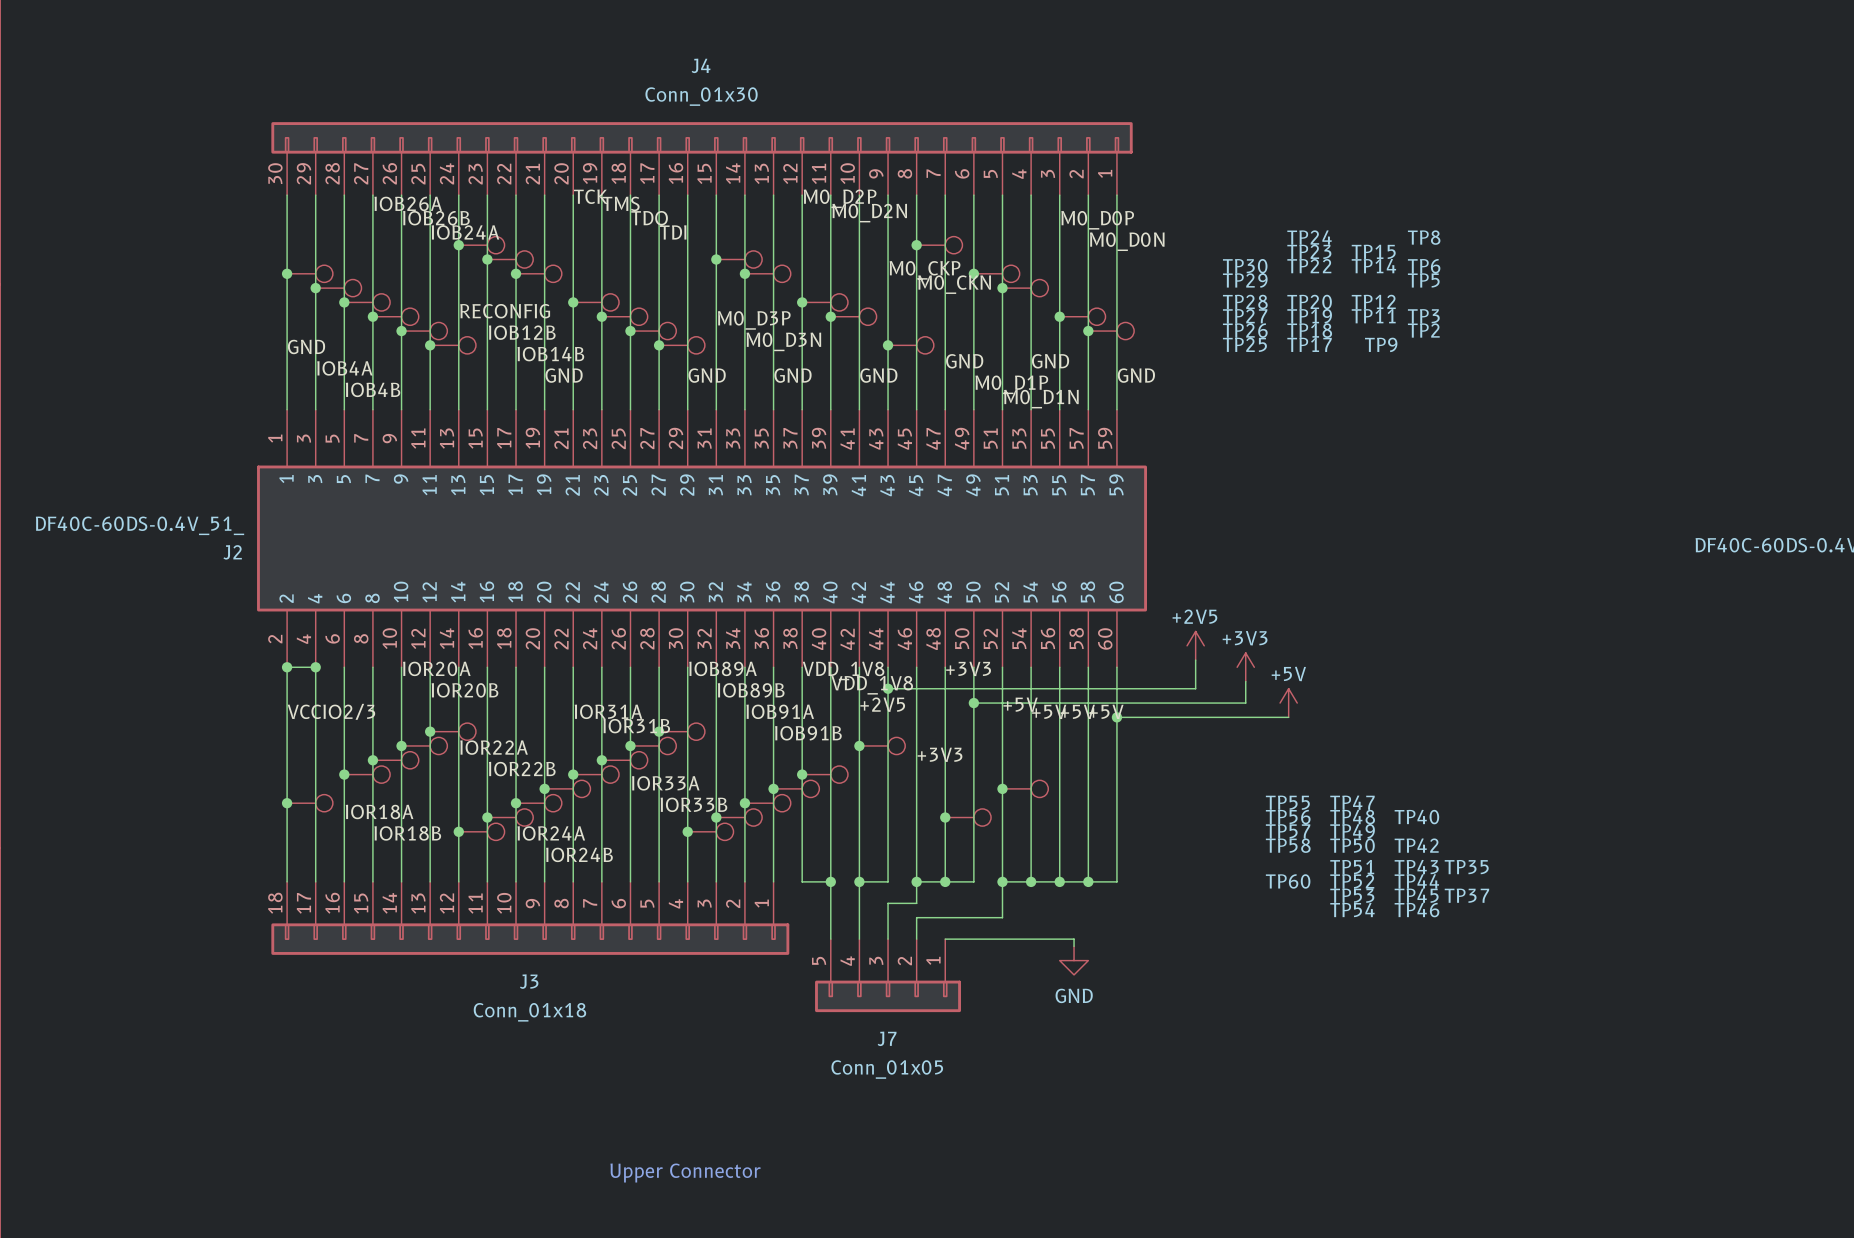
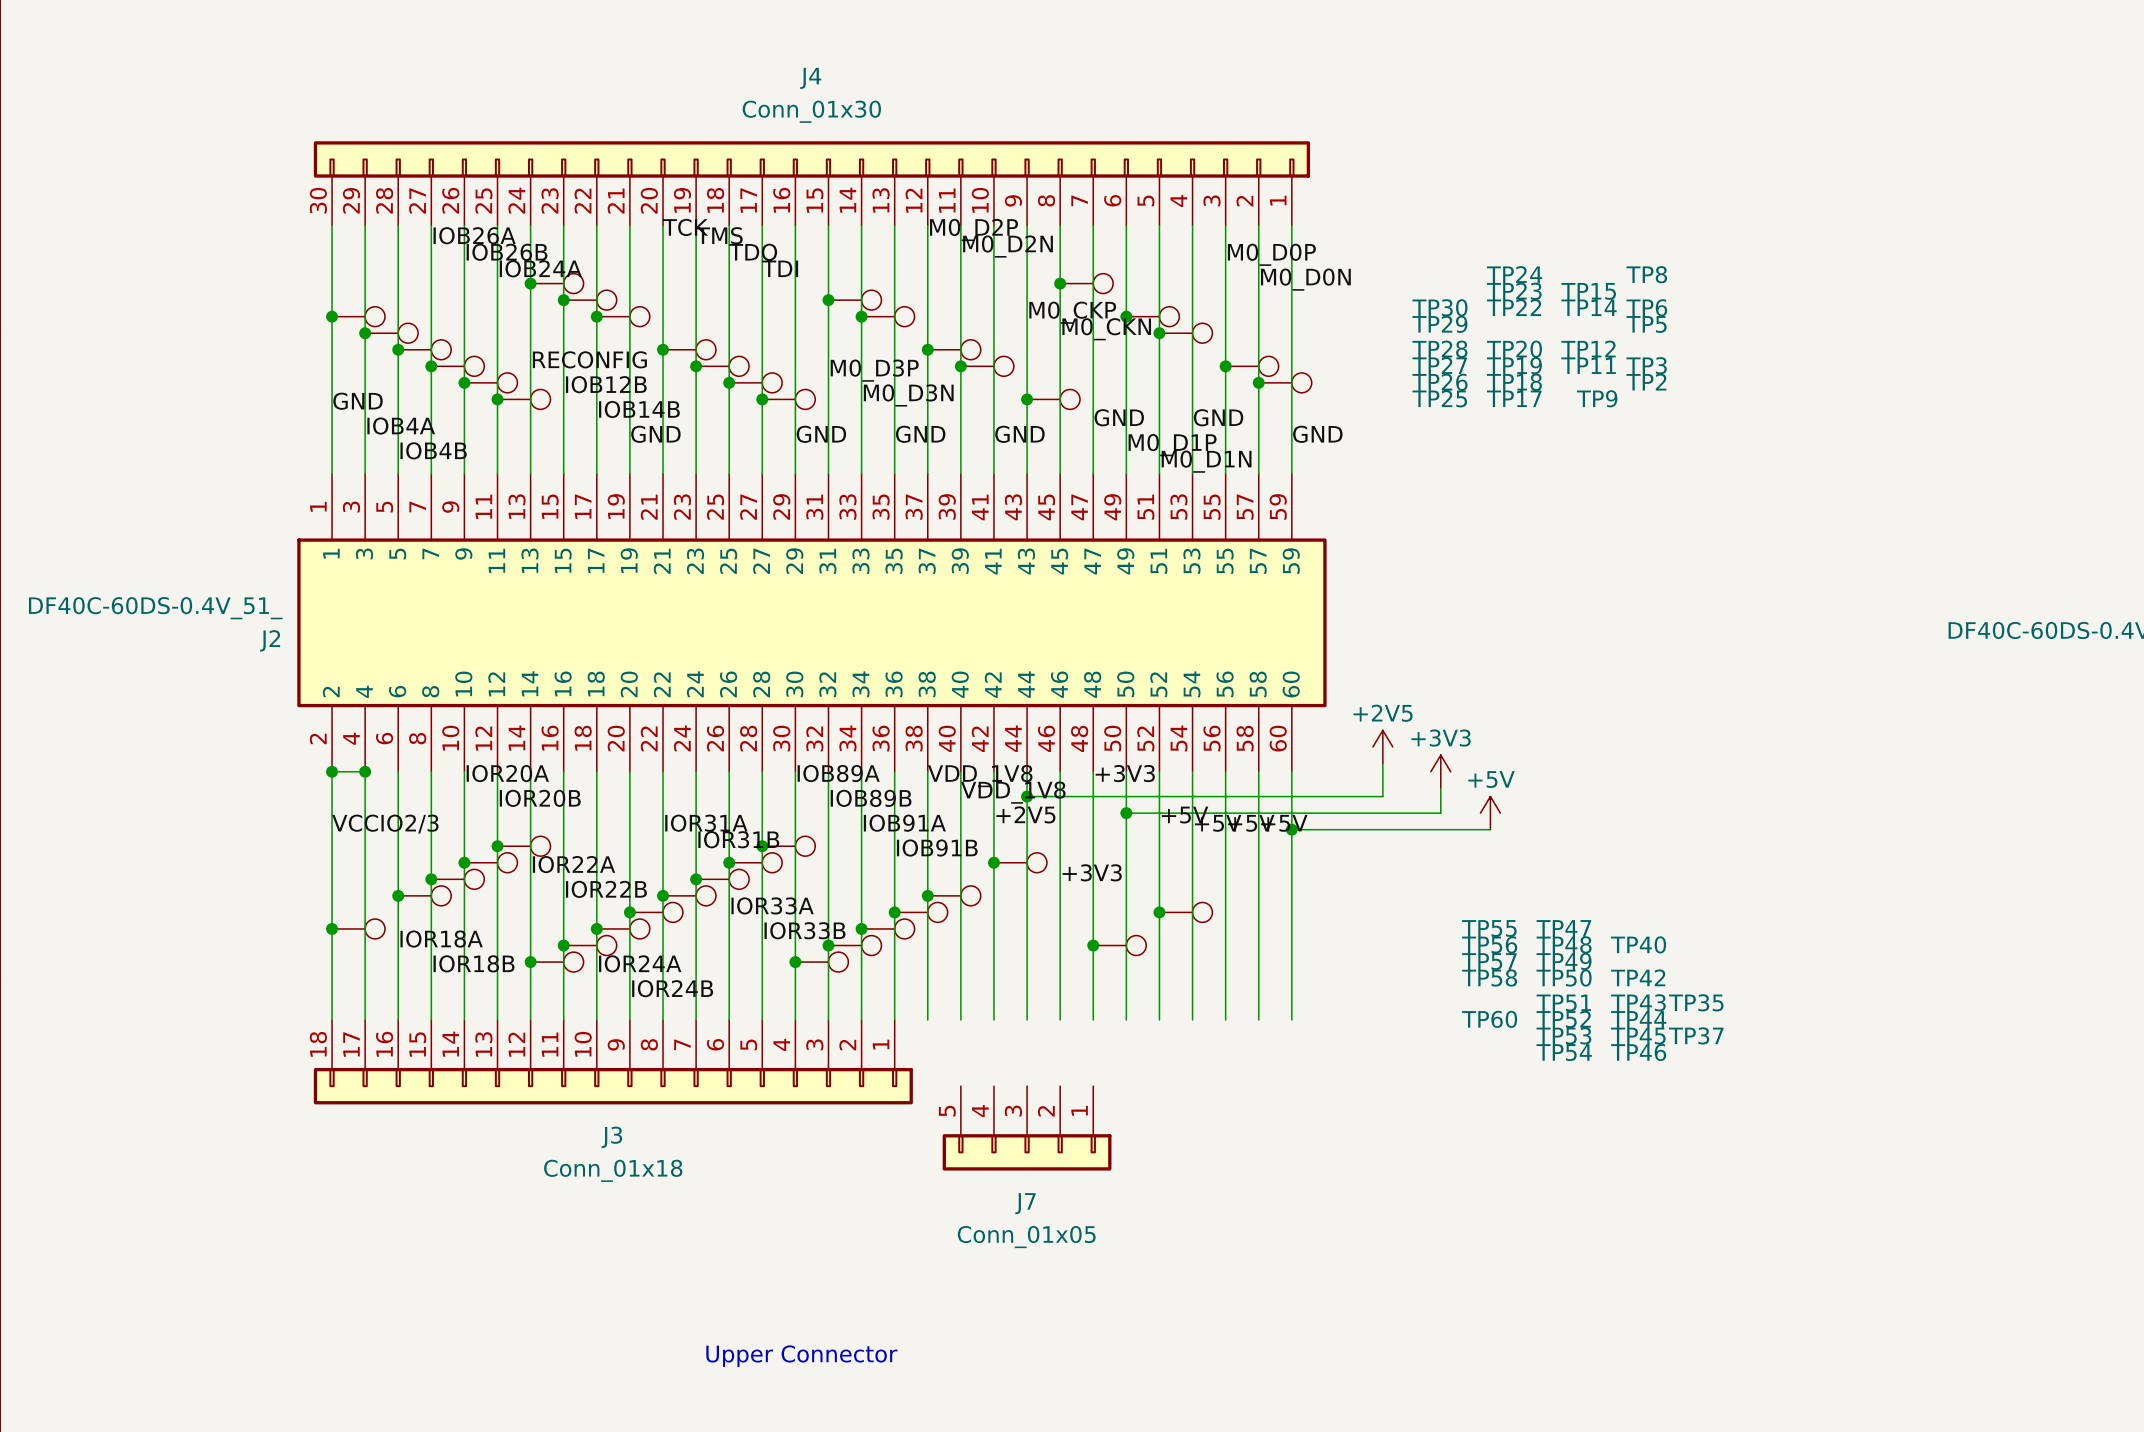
wire: (802, 881) (830, 881) (830, 939) -> none
junction: (830, 881) -> none
junction: (859, 881) -> none
wire: (888, 881) (859, 881) (859, 939) -> none
junction: (916, 881) -> none
junction: (945, 881) -> none
wire: (973, 881) (916, 881) (916, 903) (888, 903) (888, 939) -> none
junction: (1002, 881) -> none
junction: (1031, 881) -> none
junction: (1059, 881) -> none
junction: (1088, 881) -> none
wire: (1116, 881) (1002, 881) (1002, 917) (916, 917) (916, 939) -> none
wire: (945, 939) (1074, 939) (1074, 946) -> none
power symbol: GND (1074, 960) -> none

